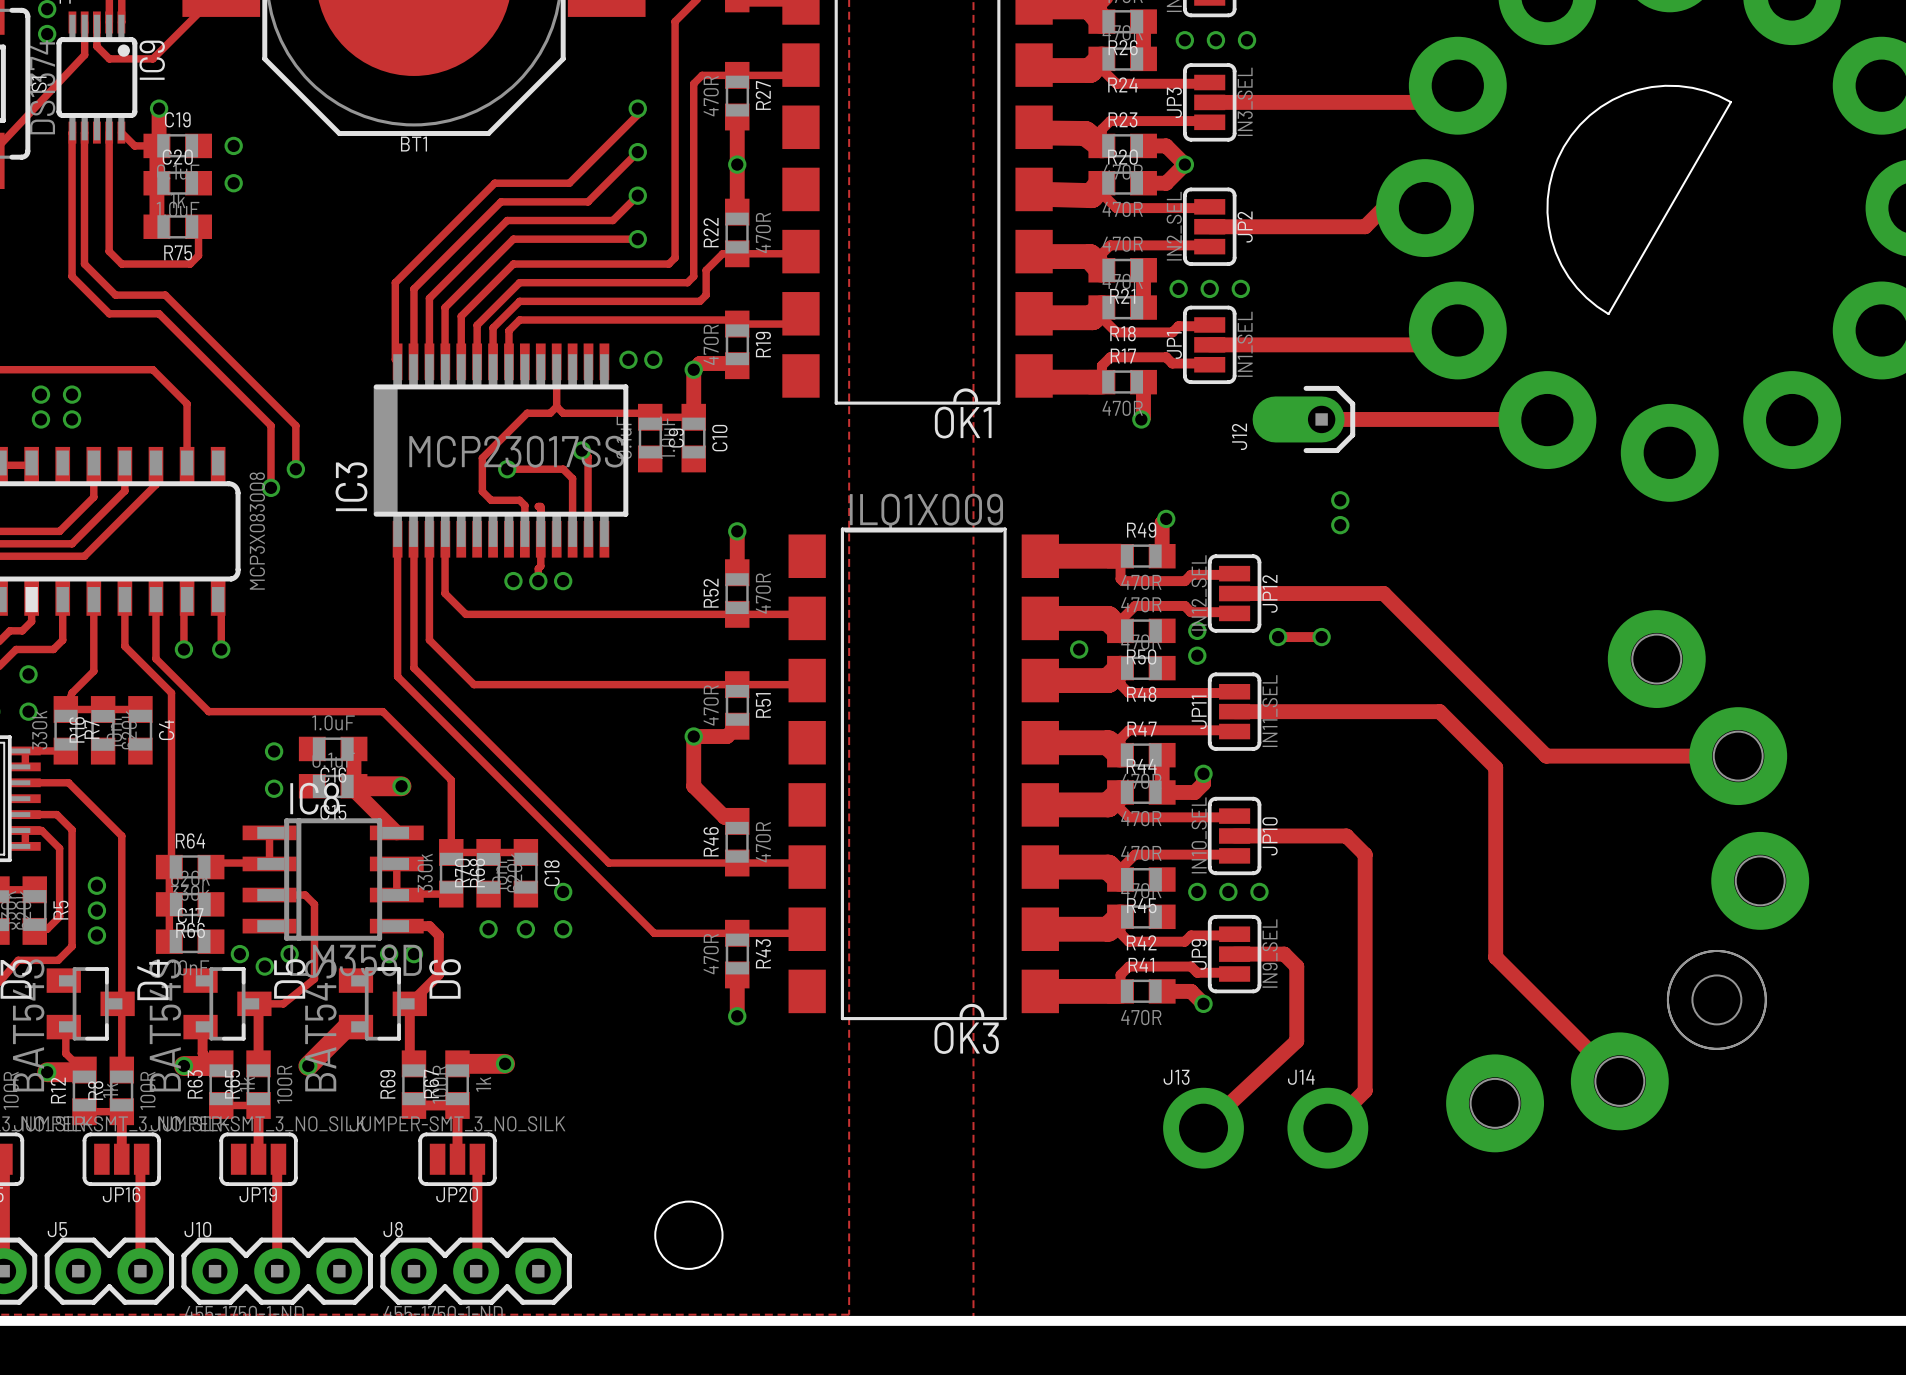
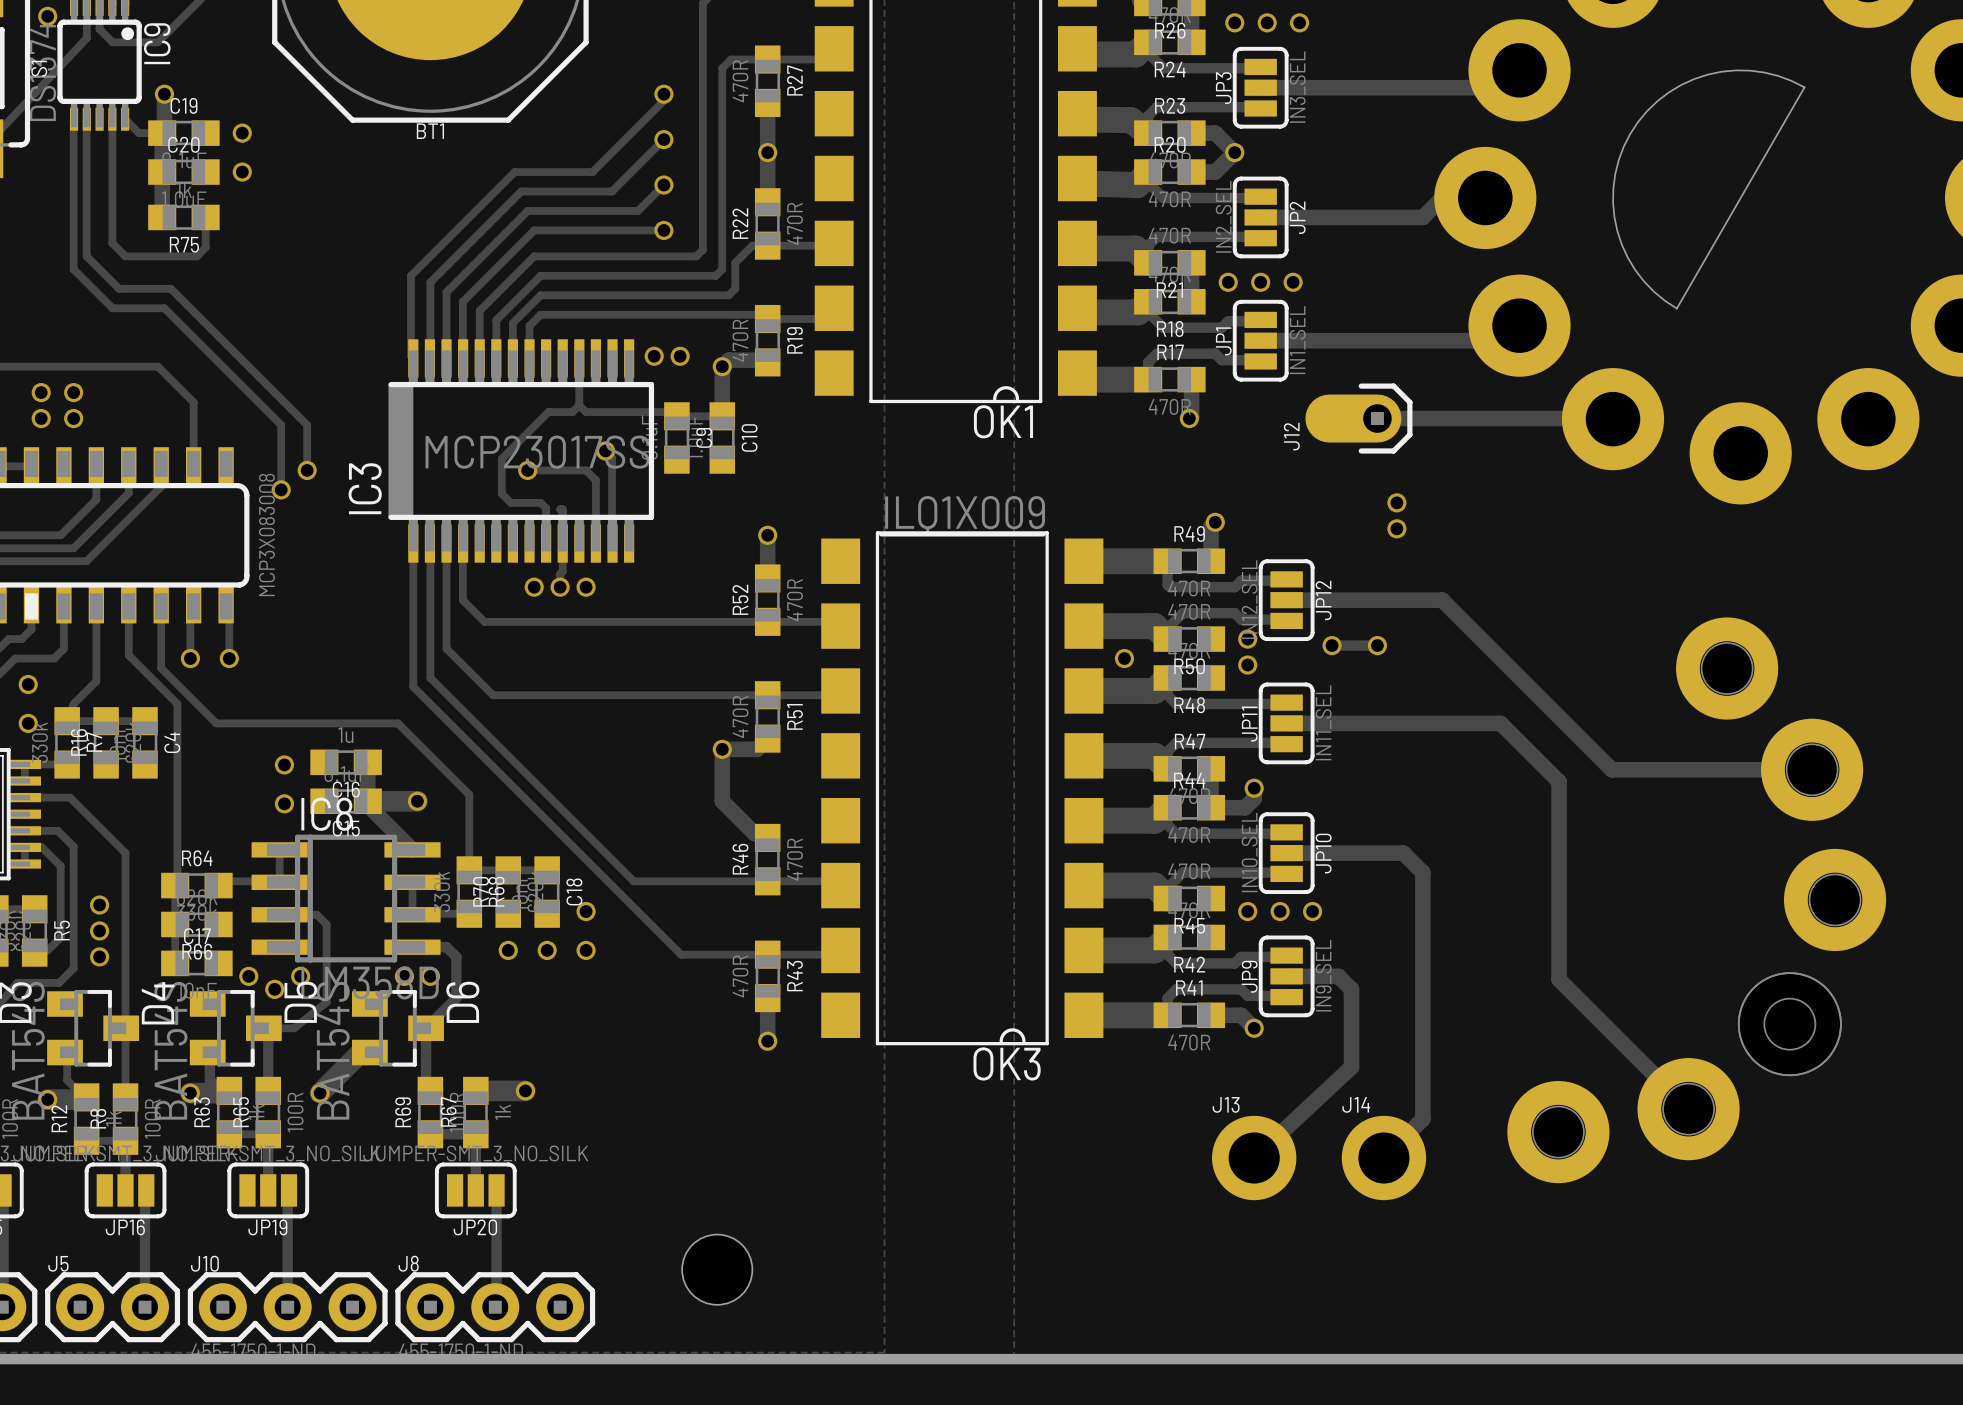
C16 value: 1.0uF (333, 722) -> 1u (345, 735)

